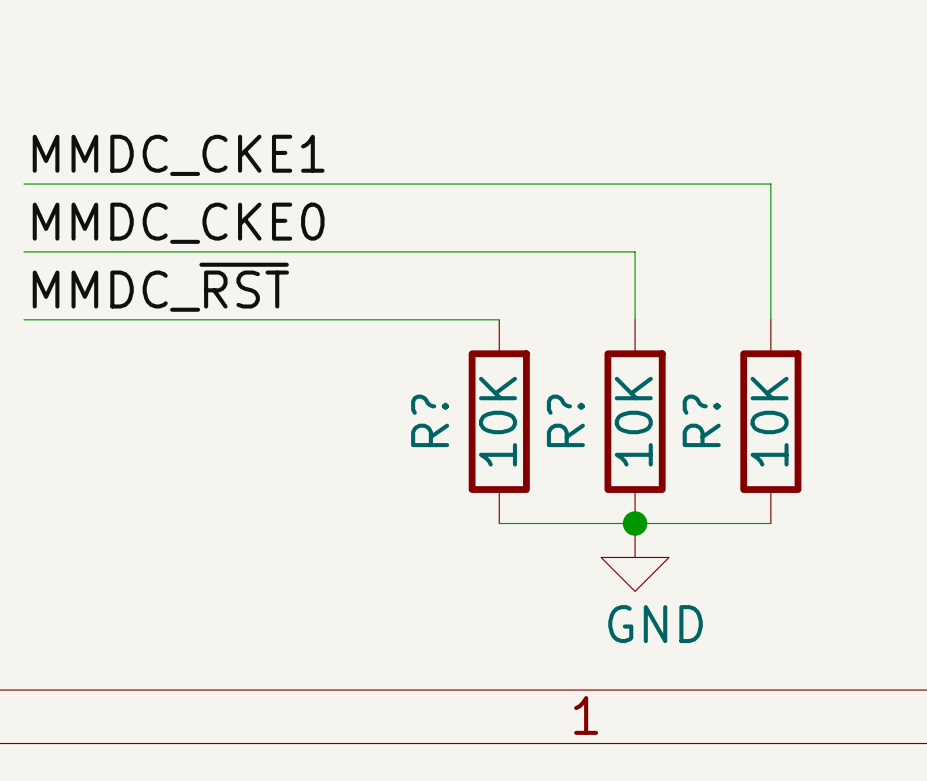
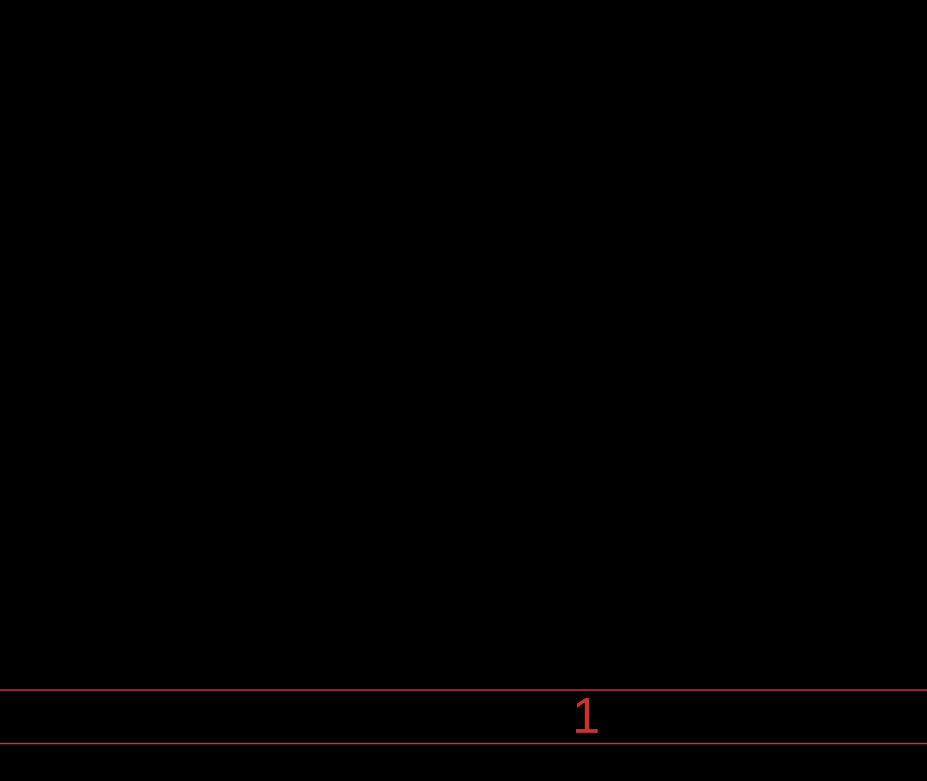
label: MMDC_CKE1 (178, 155) -> none
wire: (23, 184) (770, 184) (770, 319) -> none
label: MMDC_CKE0 (178, 223) -> none
wire: (23, 251) (635, 251) (635, 319) -> none
label: MMDC_~{RST} (160, 287) -> none
wire: (23, 319) (499, 319) -> none
R?: 10K (499, 421) -> none
R?: 10K (635, 421) -> none
R?: 10K (770, 421) -> none
wire: (499, 523) (770, 523) -> none
junction: (635, 523) -> none
power symbol: GND (635, 557) -> none

